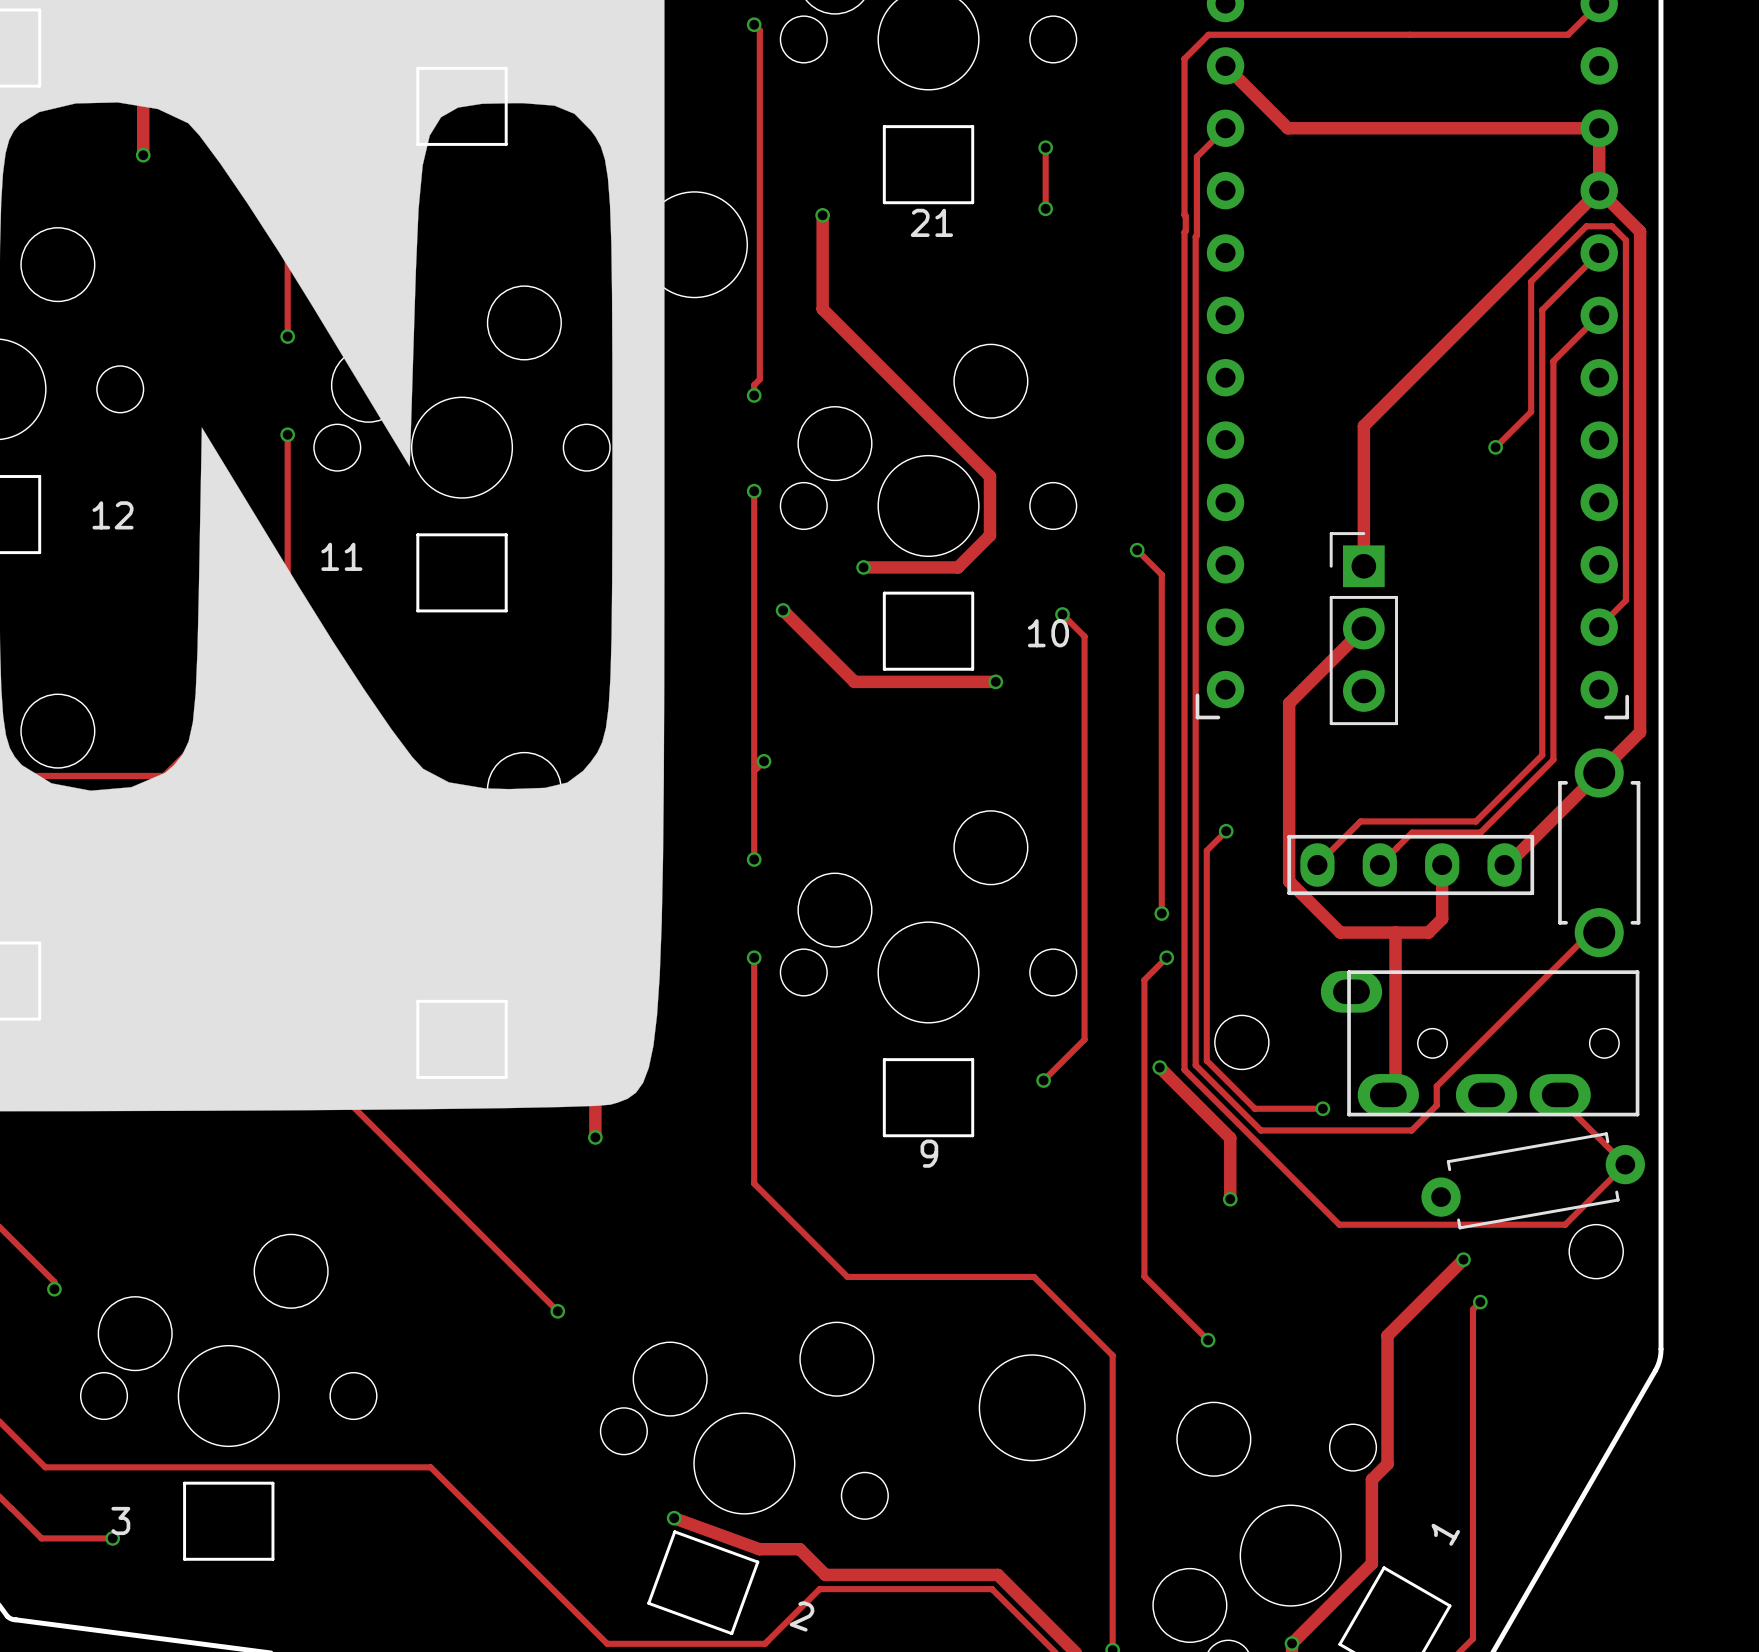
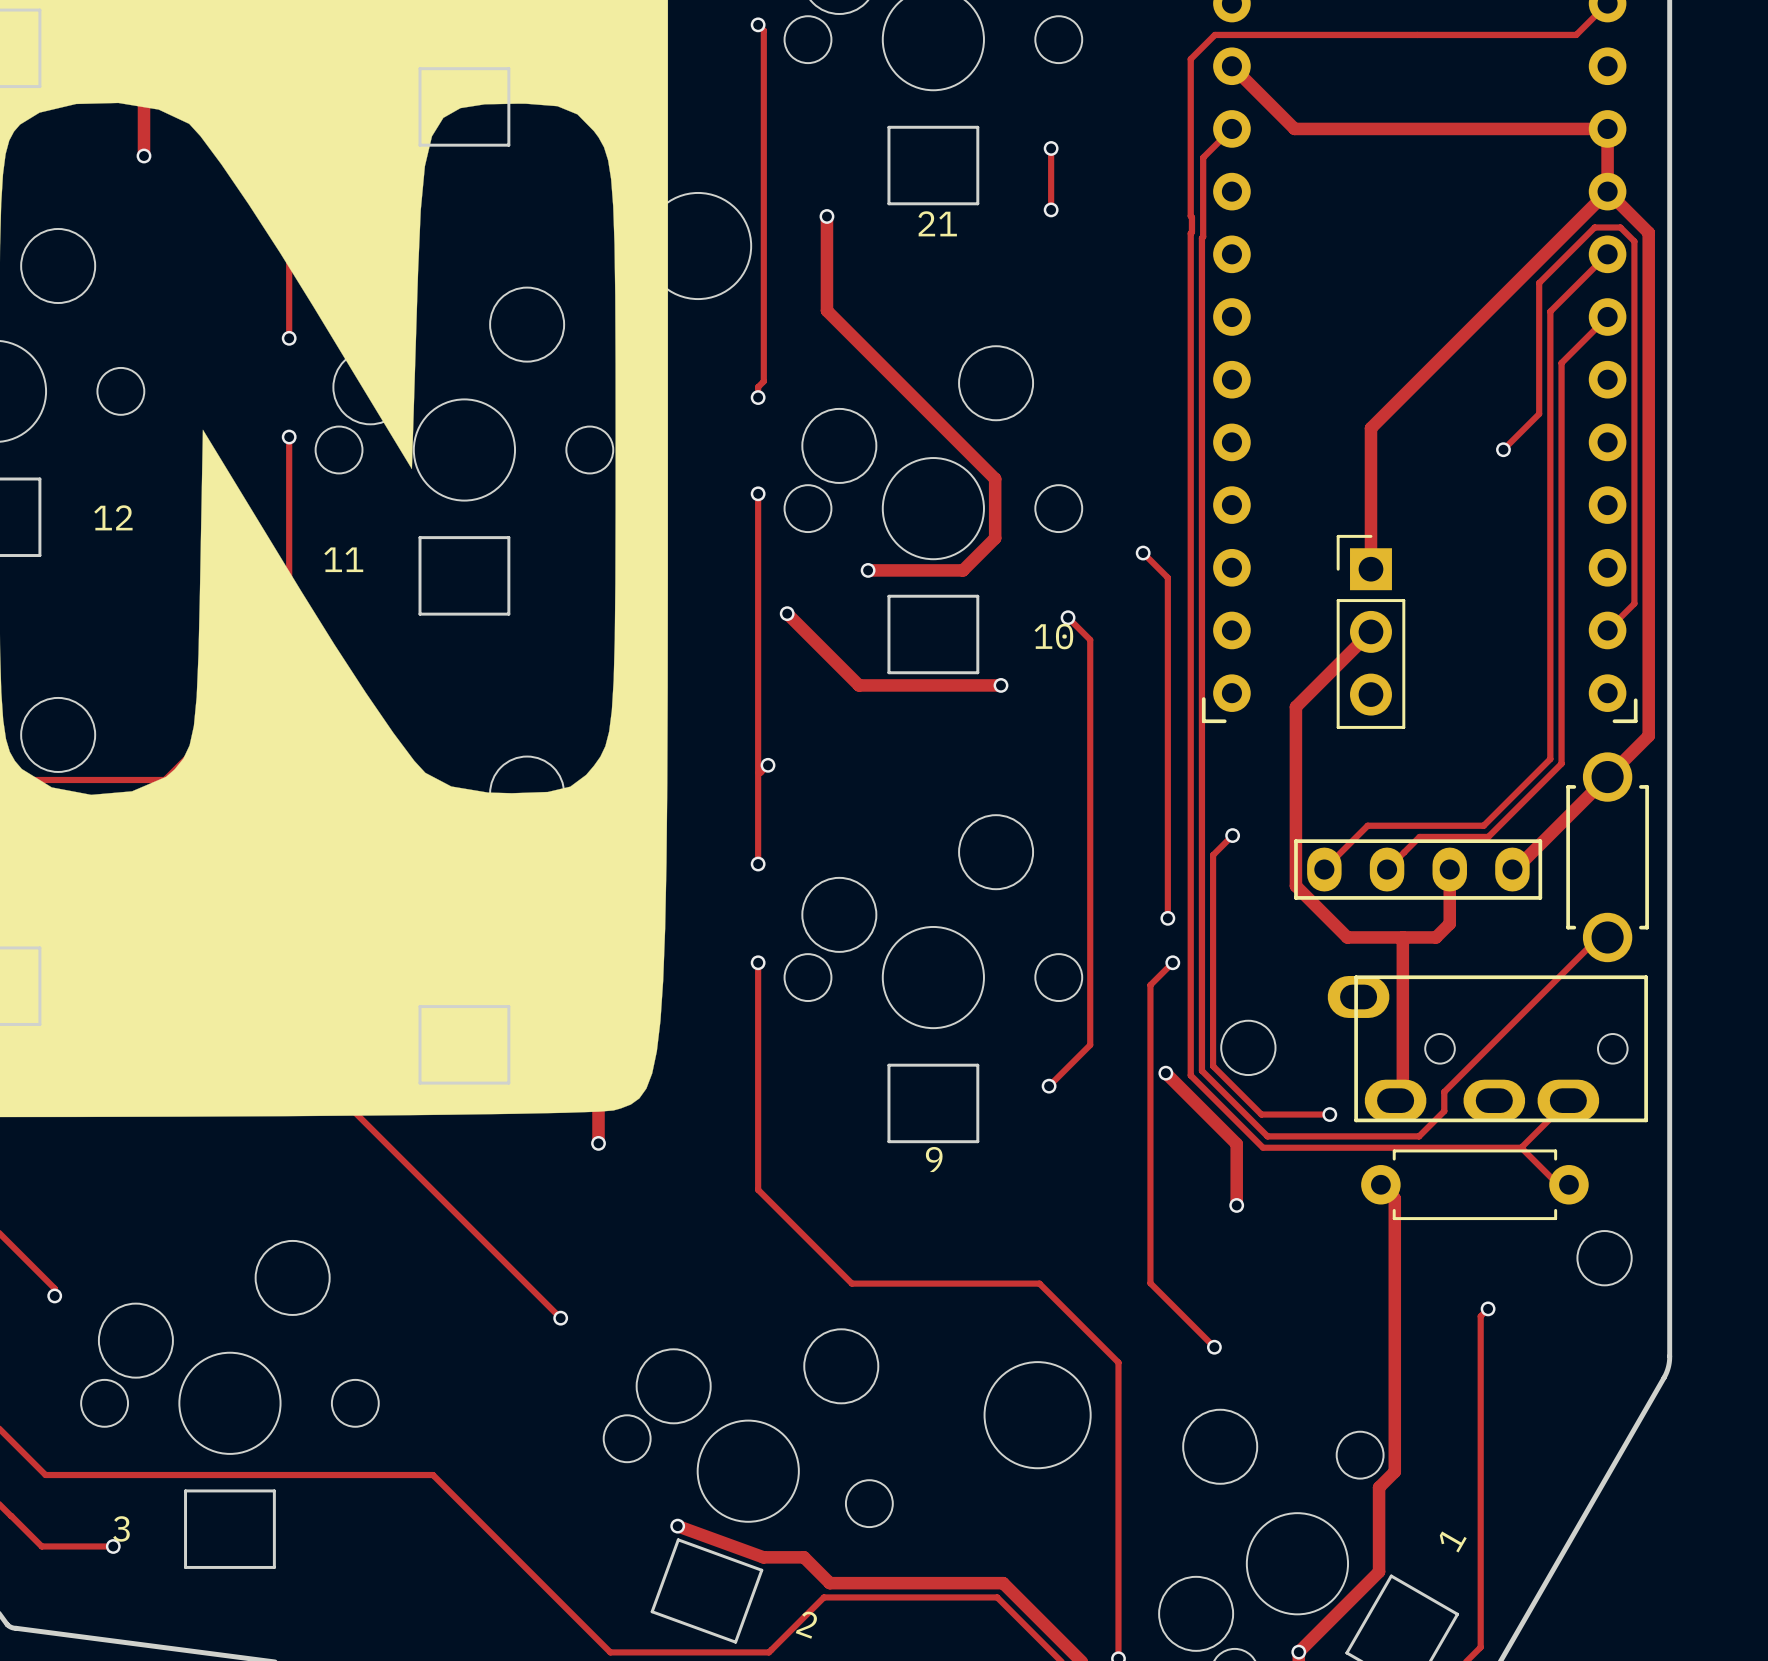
track: none -> (1568, 1100) (1521, 1147)
track: (1560, 1099) (1625, 1164) (1565, 1224) (1339, 1224) (1256, 1141) -> (1521, 1147) (1263, 1147)
track: none -> (1521, 1147) (1558, 1184) (1568, 1184)
part: none -> (1474, 1184)
part: (1533, 1180) -> none
track: (1463, 1259) (1387, 1335) -> (1380, 1184) (1394, 1198) (1394, 1342)
via: (1463, 1259) -> none

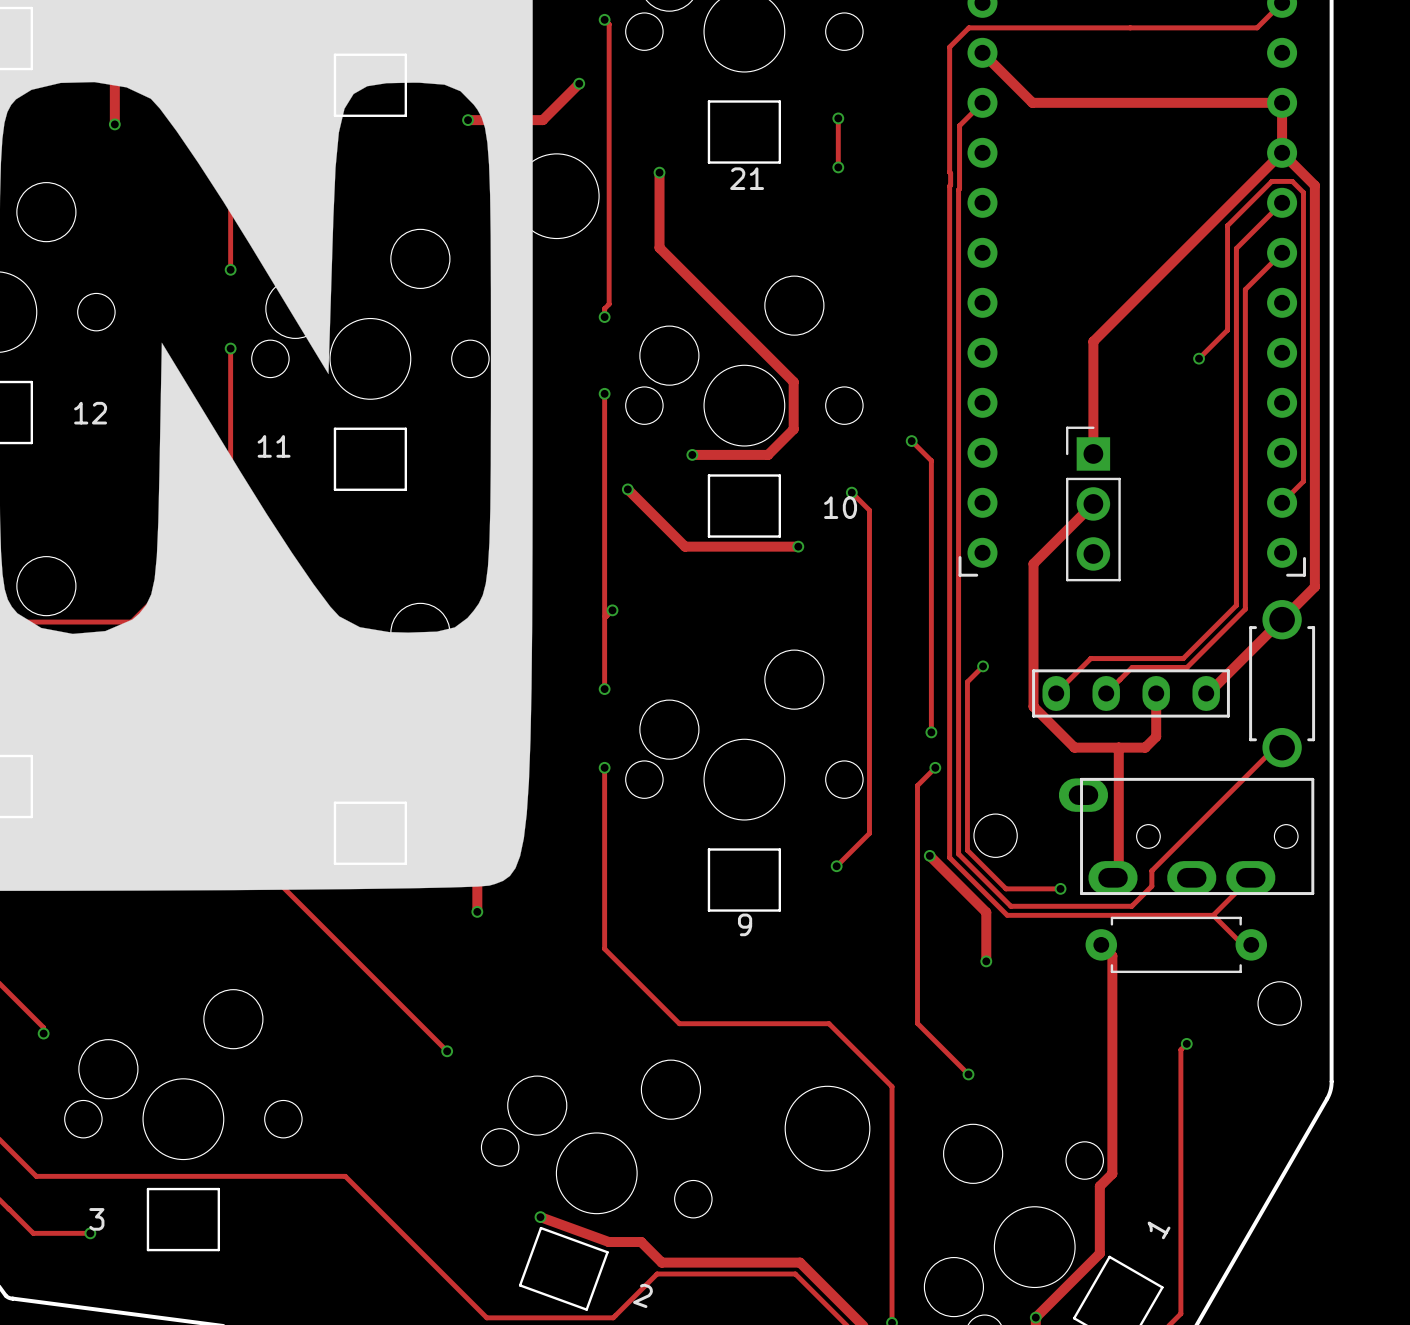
track: none -> (579, 83) (542, 120) (468, 120)
via: none -> (579, 83)
via: none -> (468, 120)

